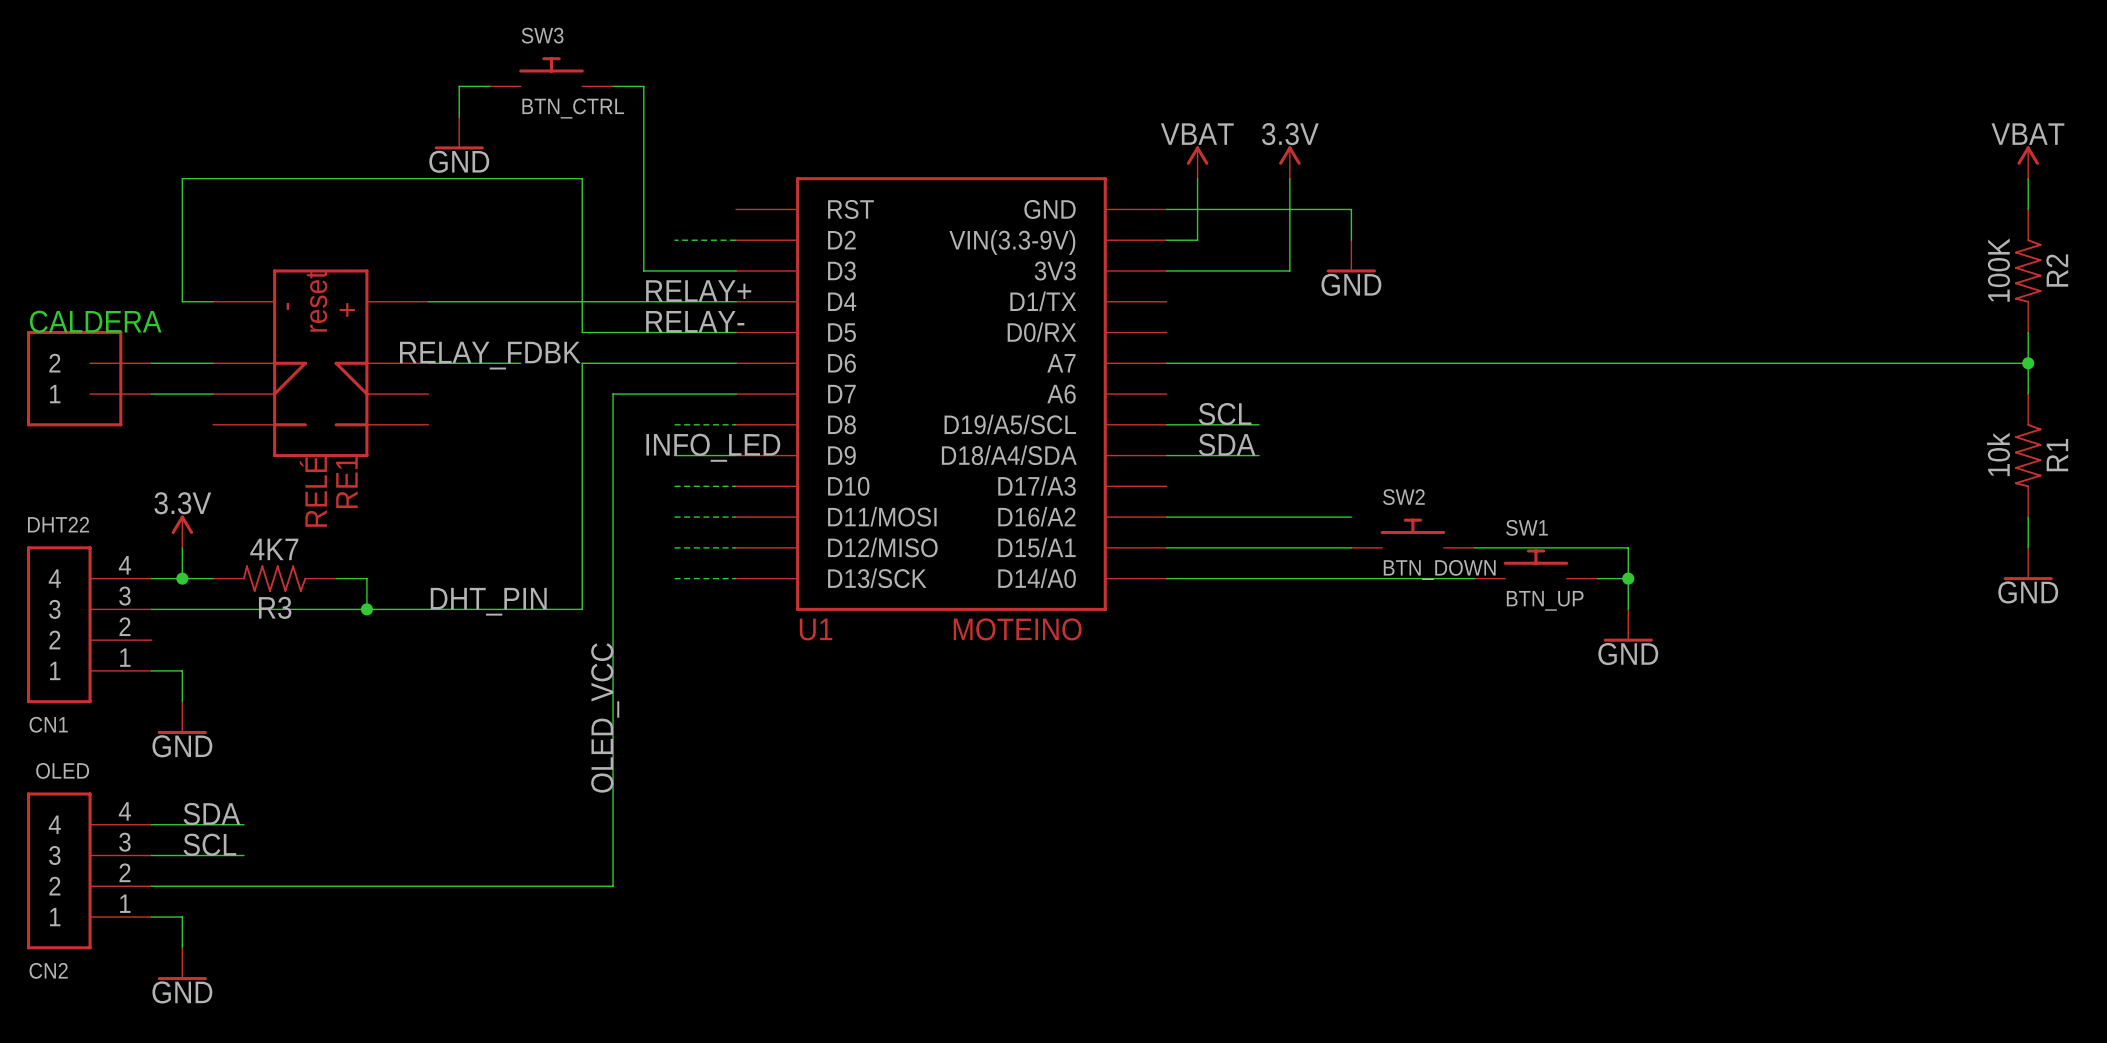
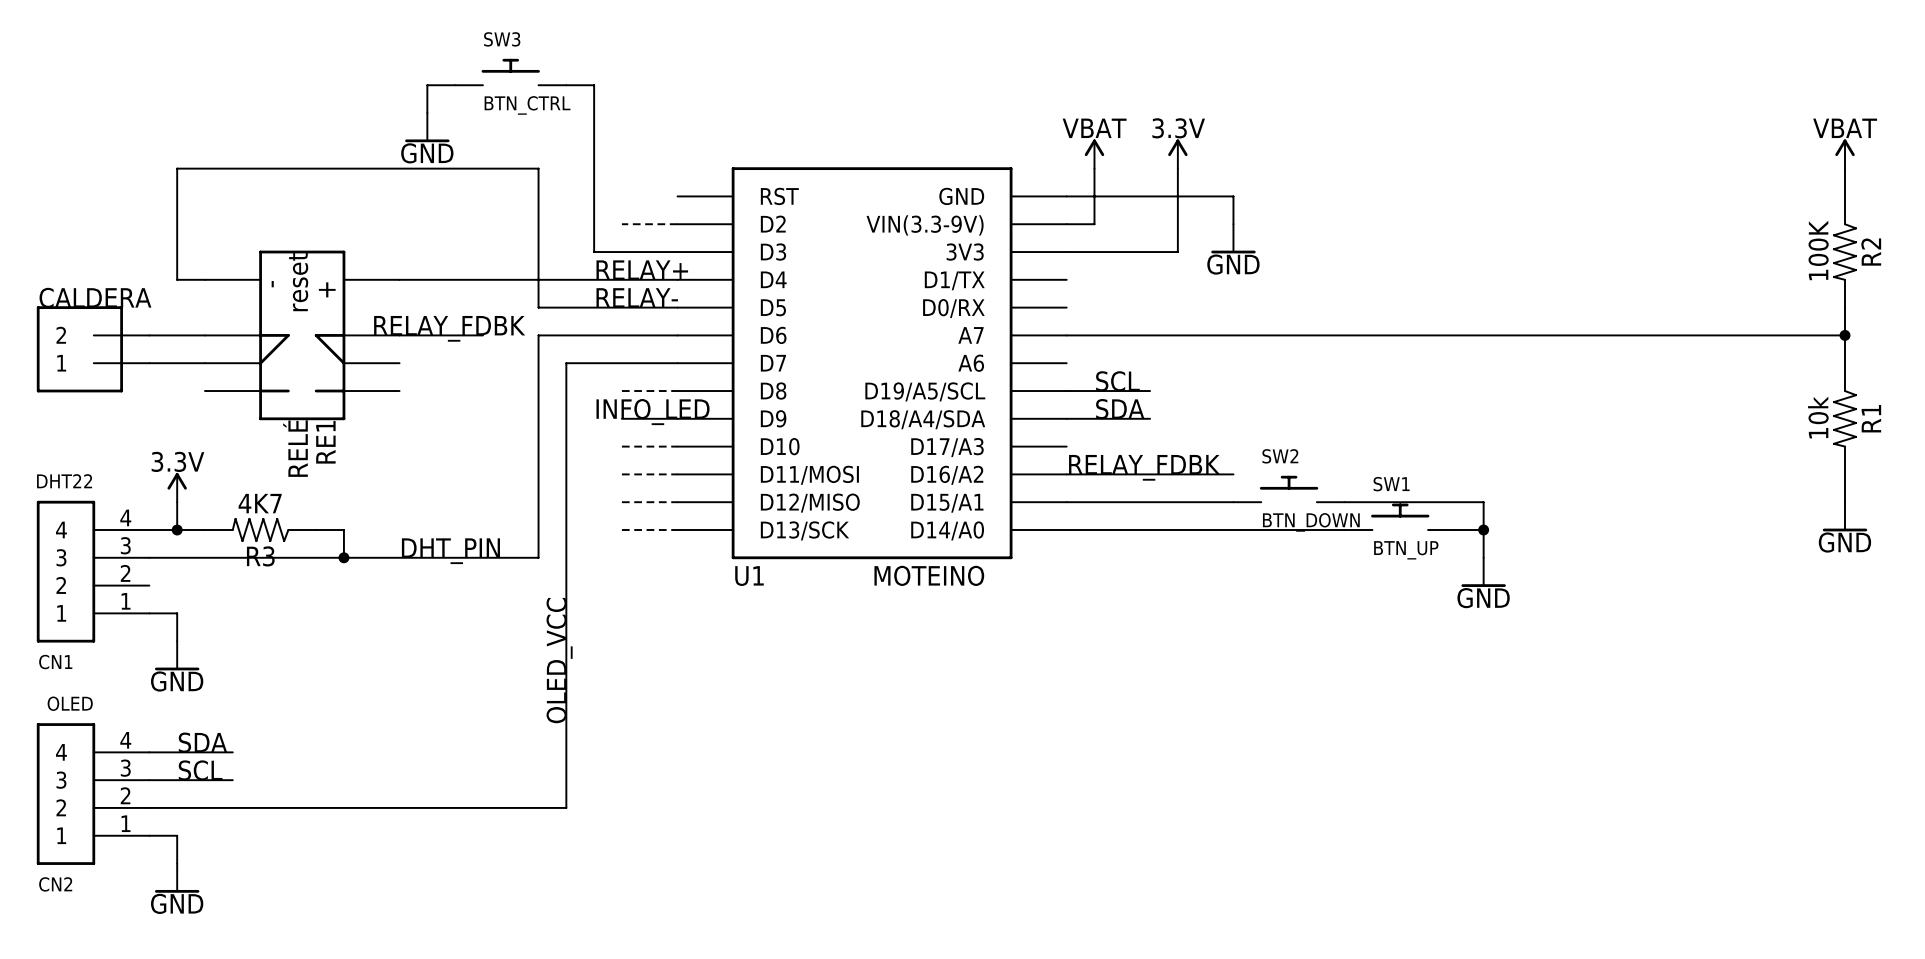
label: none -> RELAY_FDBK (1144, 467)

